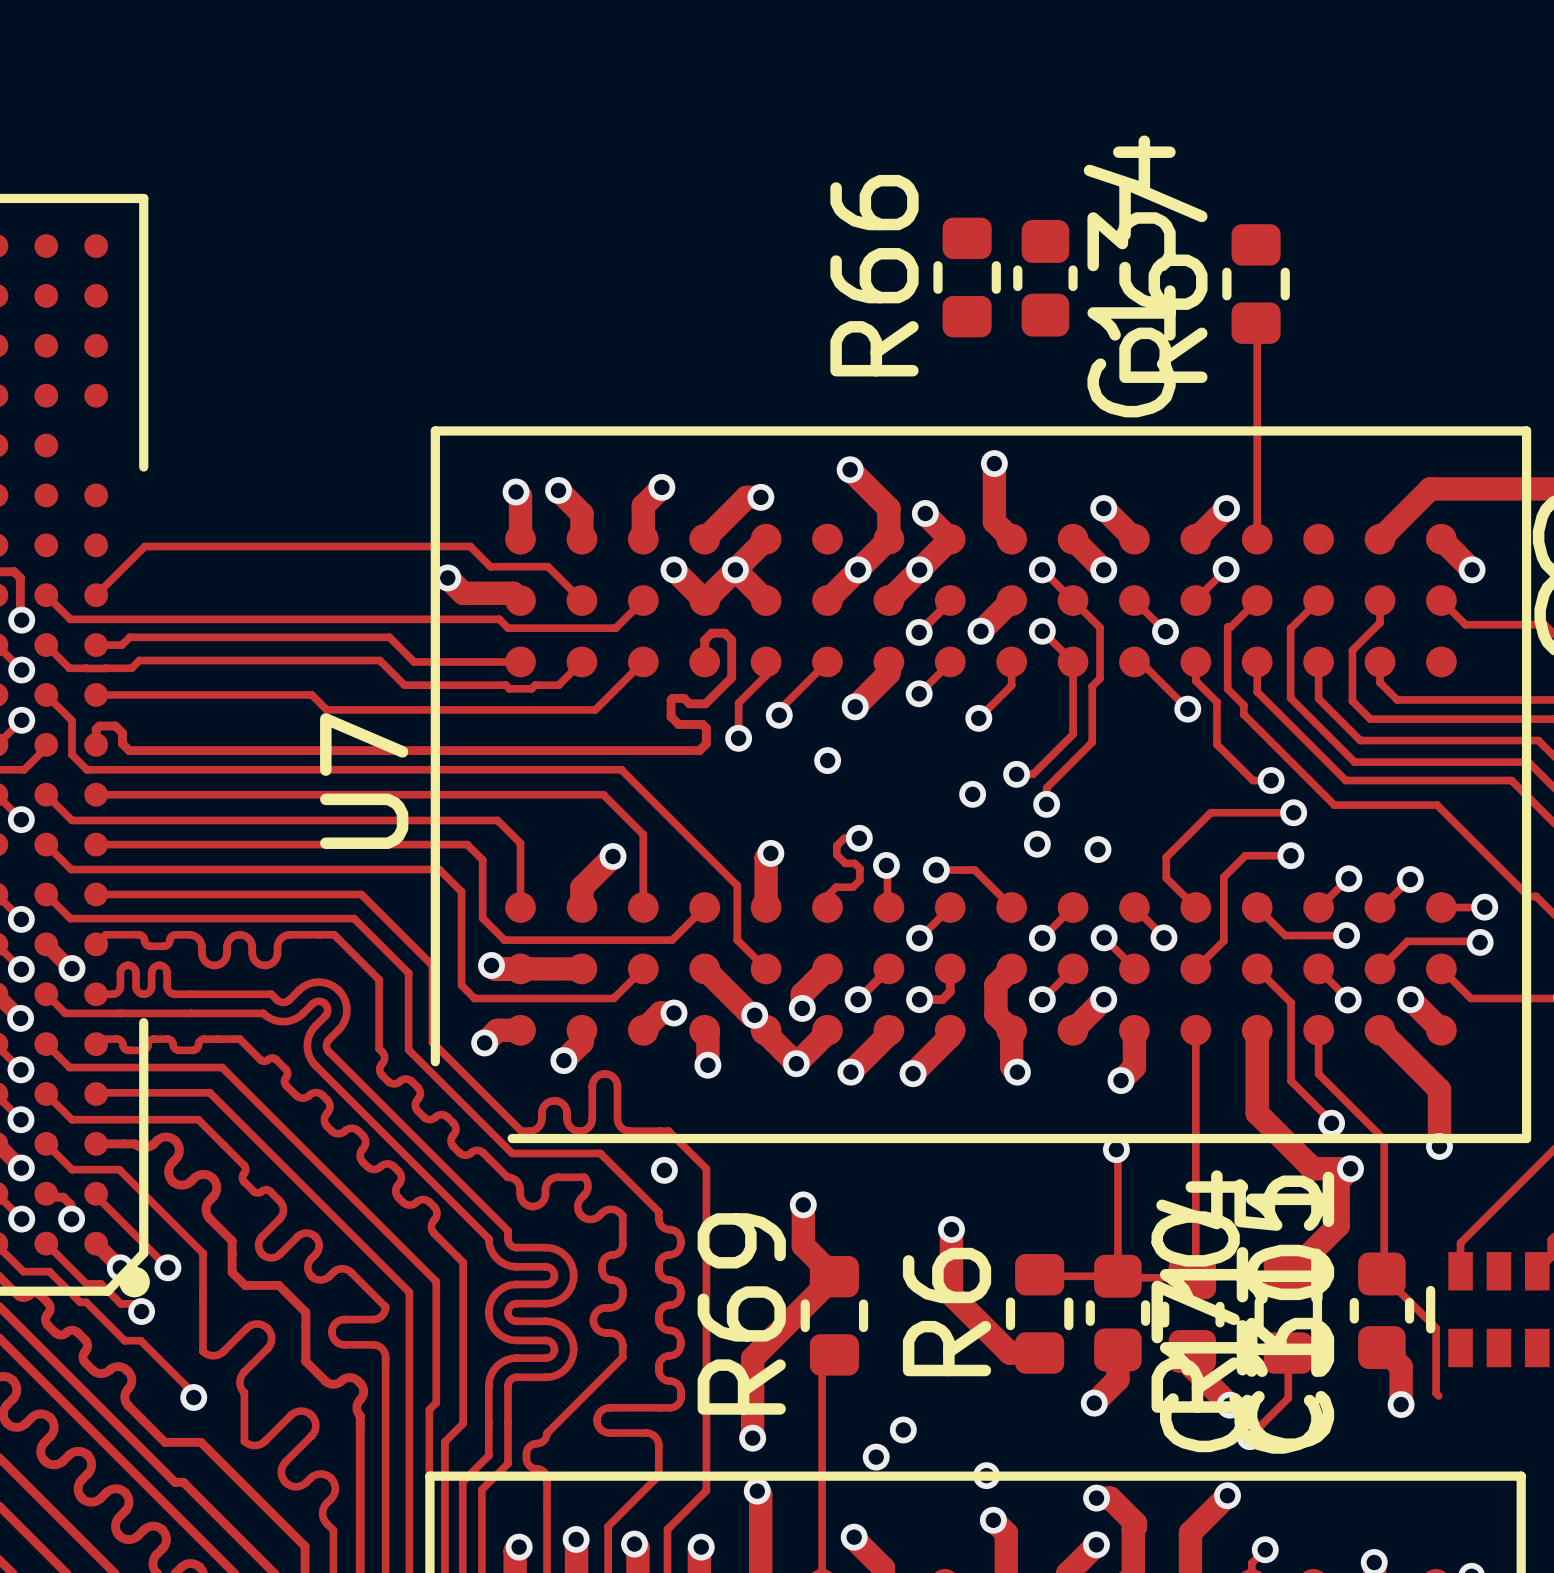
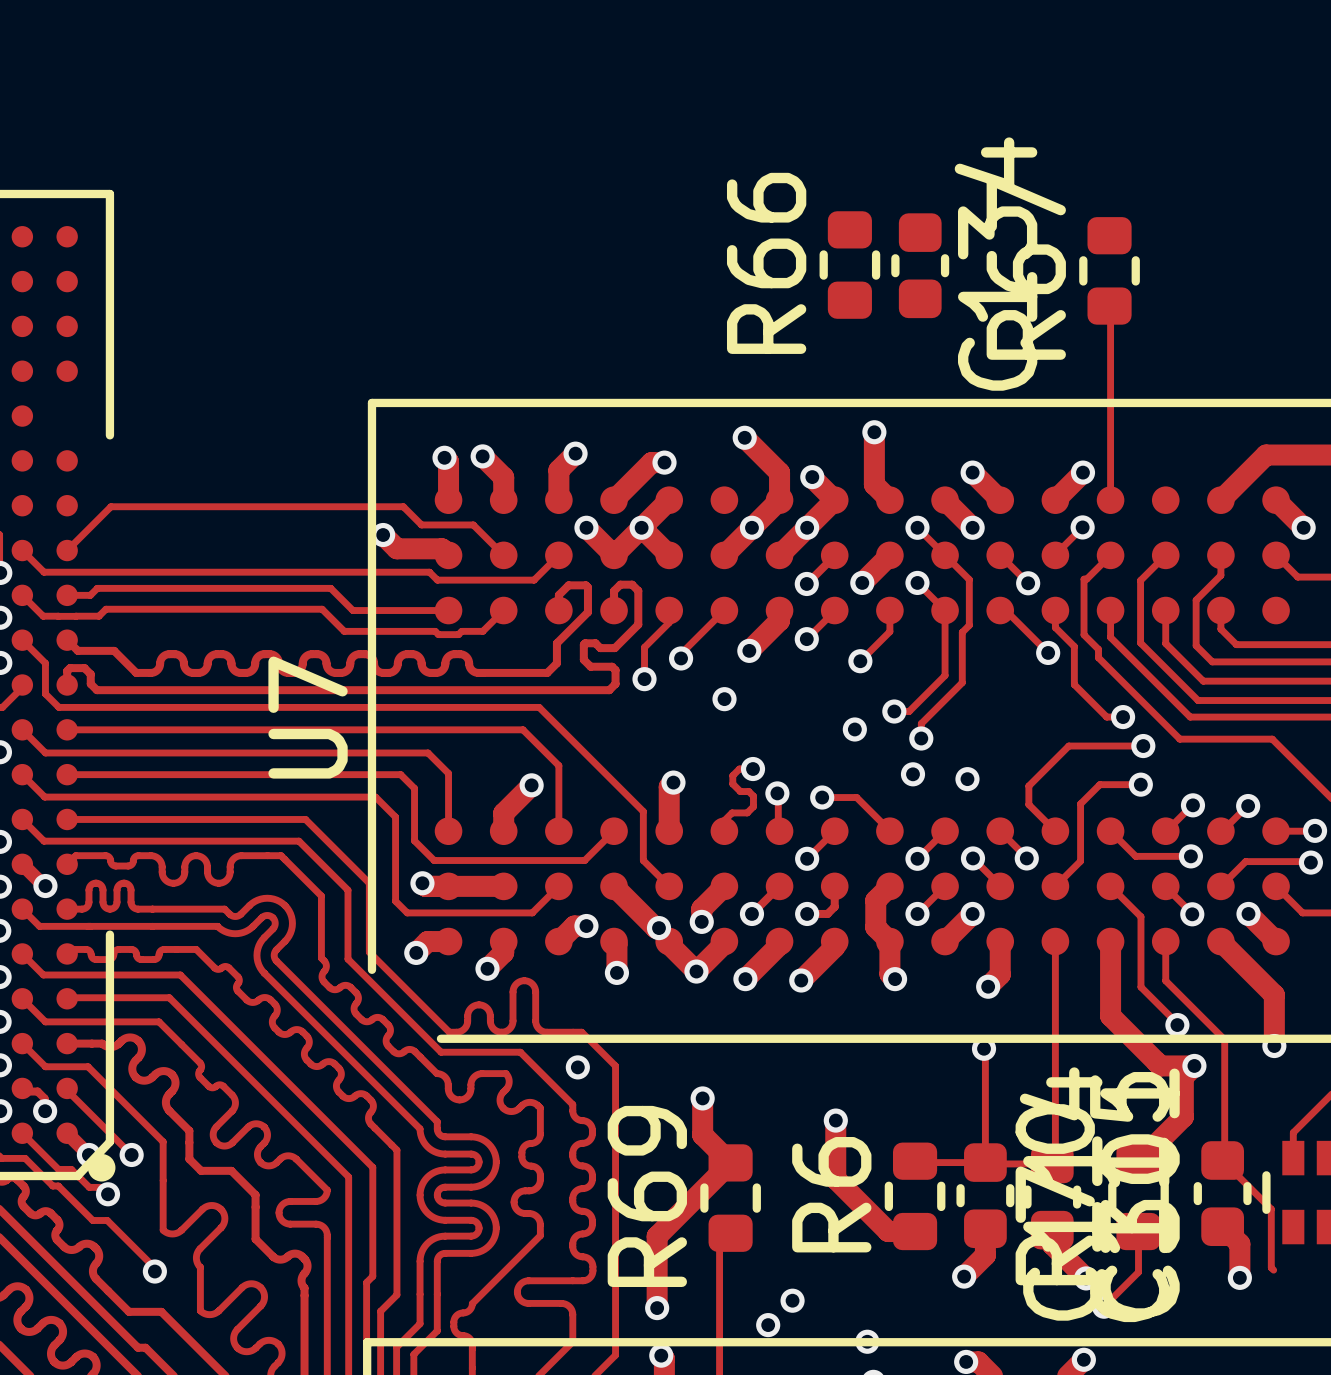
track: (643, 661) (595, 709) (326, 709) (311, 694) (96, 694) -> (558, 610) (558, 595) (568, 585) (585, 585) (587, 587) (587, 612) (556, 643) (556, 663) (547, 672) (476, 672) (470, 668) (466, 656) (459, 654) (448, 656) (444, 668) (440, 671) (429, 672) (423, 669) (418, 656) (412, 654) (401, 656) (395, 669) (389, 672) (377, 671) (372, 657) (364, 654) (353, 656) (349, 668) (345, 671) (333, 672) (327, 668) (322, 656) (312, 654) (304, 657) (299, 670) (287, 672) (281, 669) (275, 656) (264, 654) (257, 657) (251, 670) (239, 672) (233, 669) (227, 656) (217, 654) (209, 657) (204, 670) (192, 672) (185, 669) (180, 656) (169, 654) (162, 657) (155, 671) (136, 672) (114, 650) (77, 650) (67, 640)

